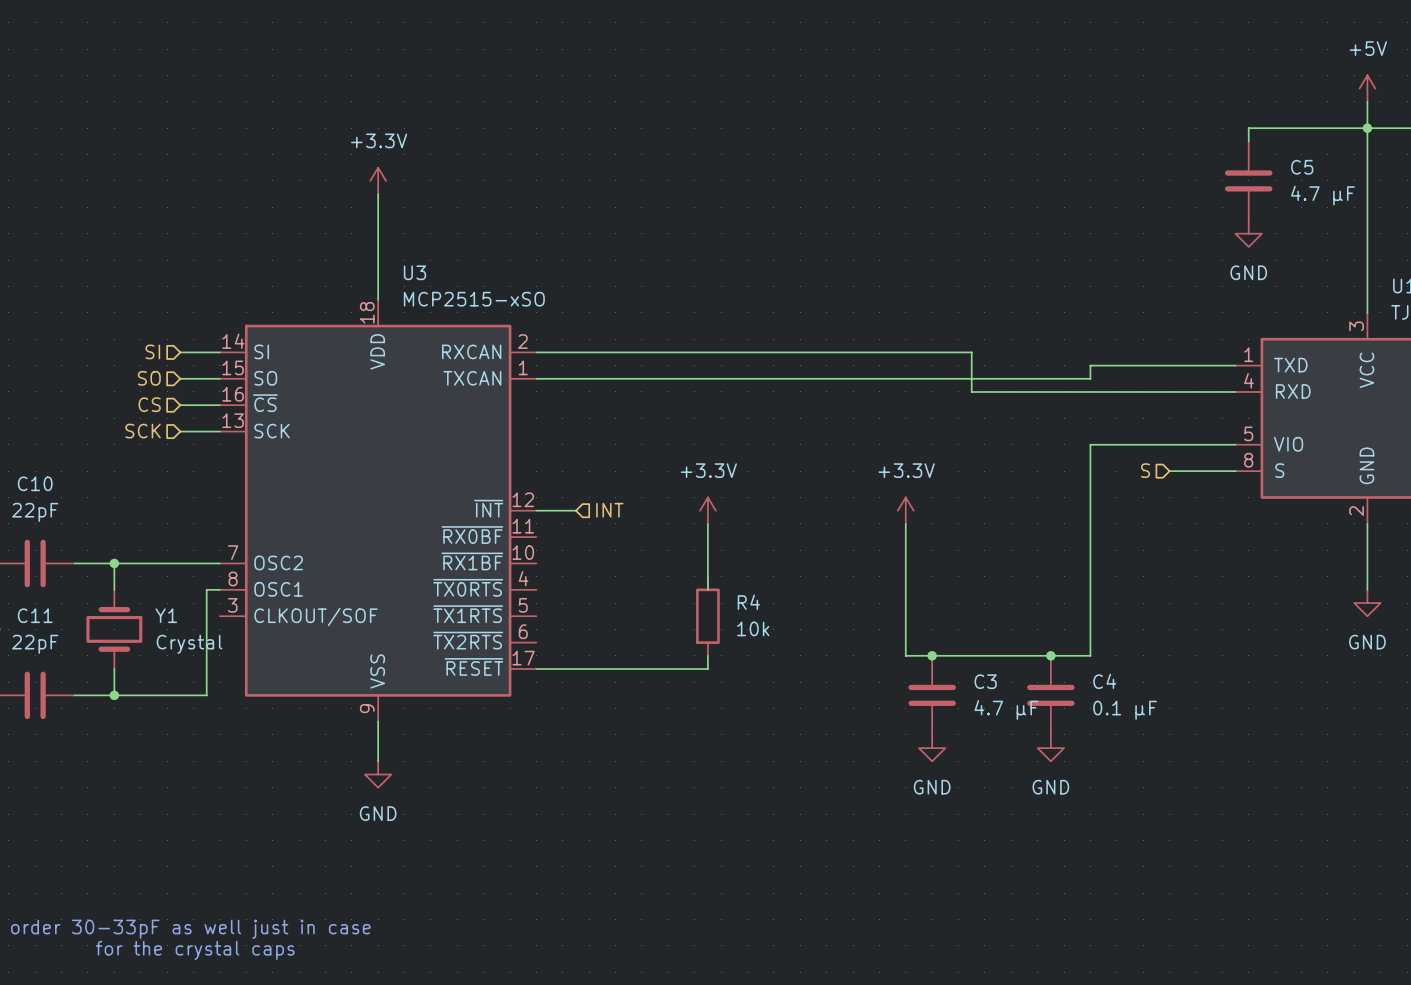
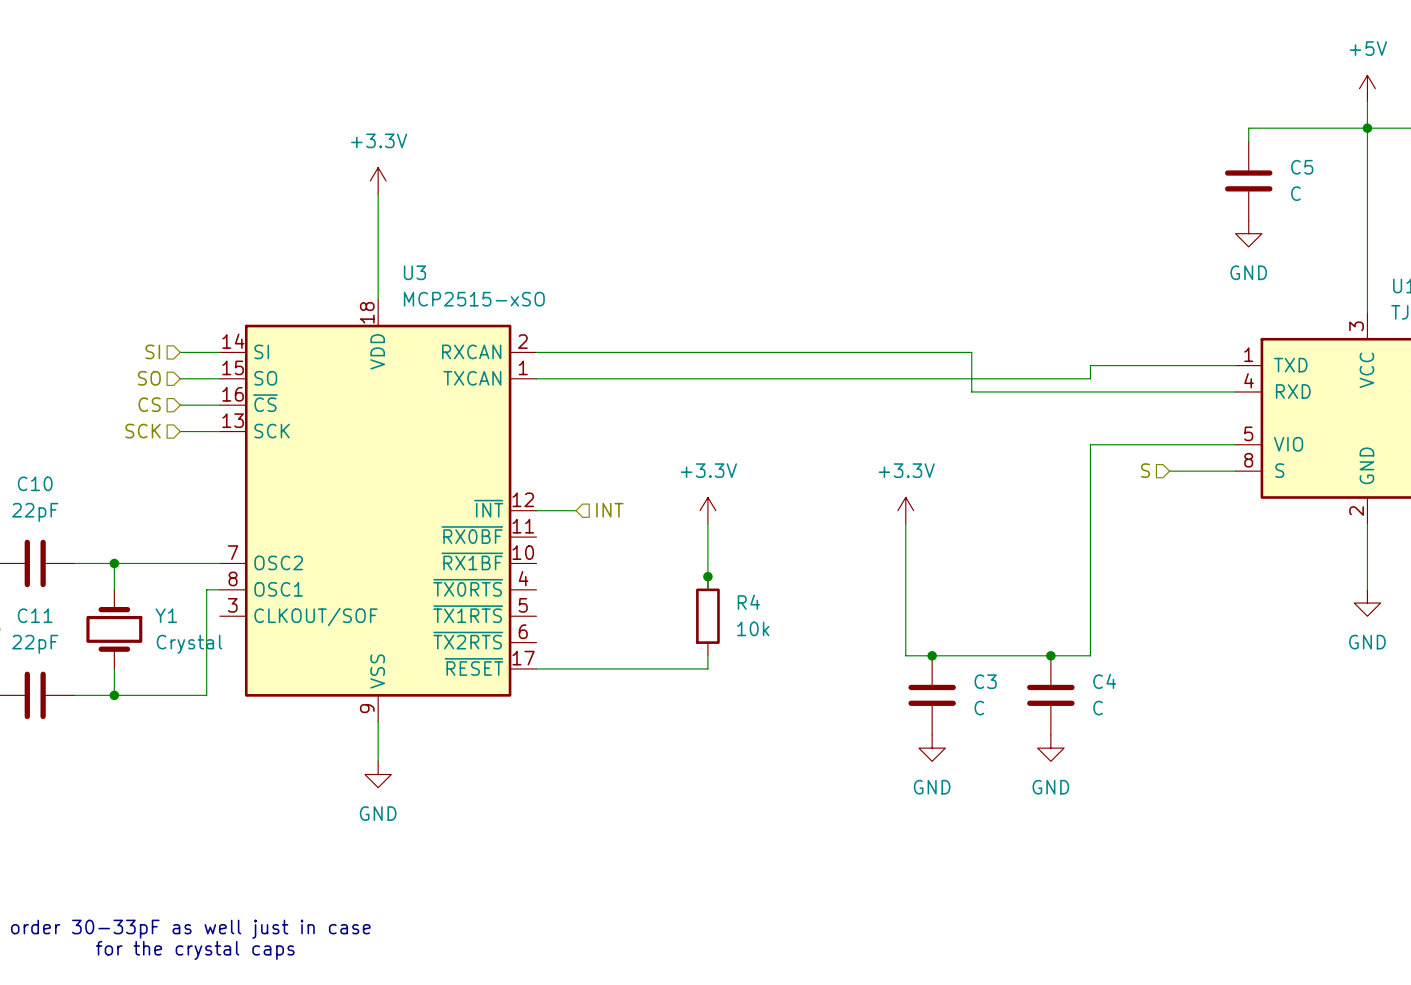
C5 value: 4.7 µF (1322, 195) -> C (1295, 193)
junction: none -> (707, 576)
C3 value: 4.7 µF (1006, 709) -> C (979, 708)
C4 value: 0.1 µF (1125, 710) -> C (1098, 708)

